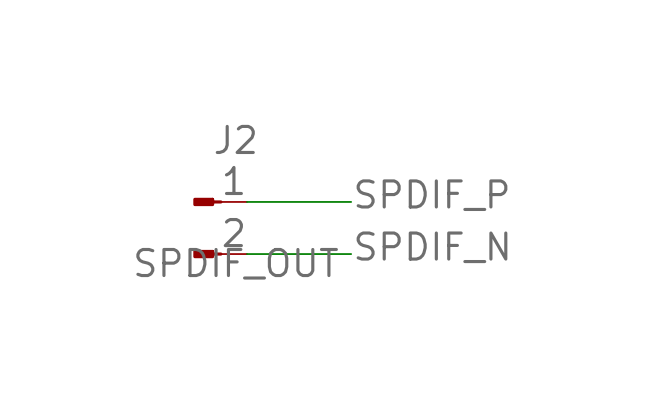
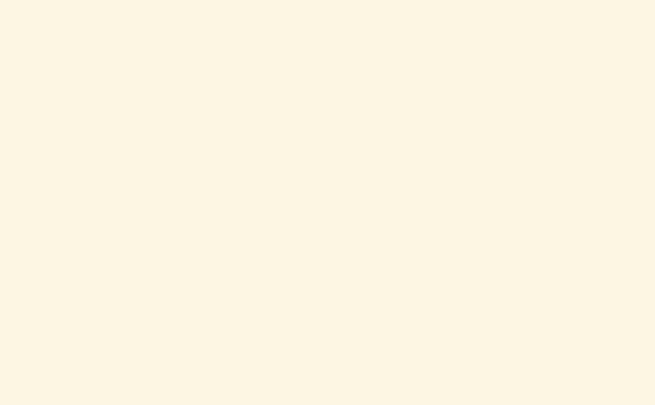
label: SPDIF_P (431, 195) -> none
wire: (246, 201) (351, 201) -> none
J2: SPDIF_OUT (220, 228) -> none
label: SPDIF_N (431, 247) -> none
wire: (246, 254) (351, 254) -> none

